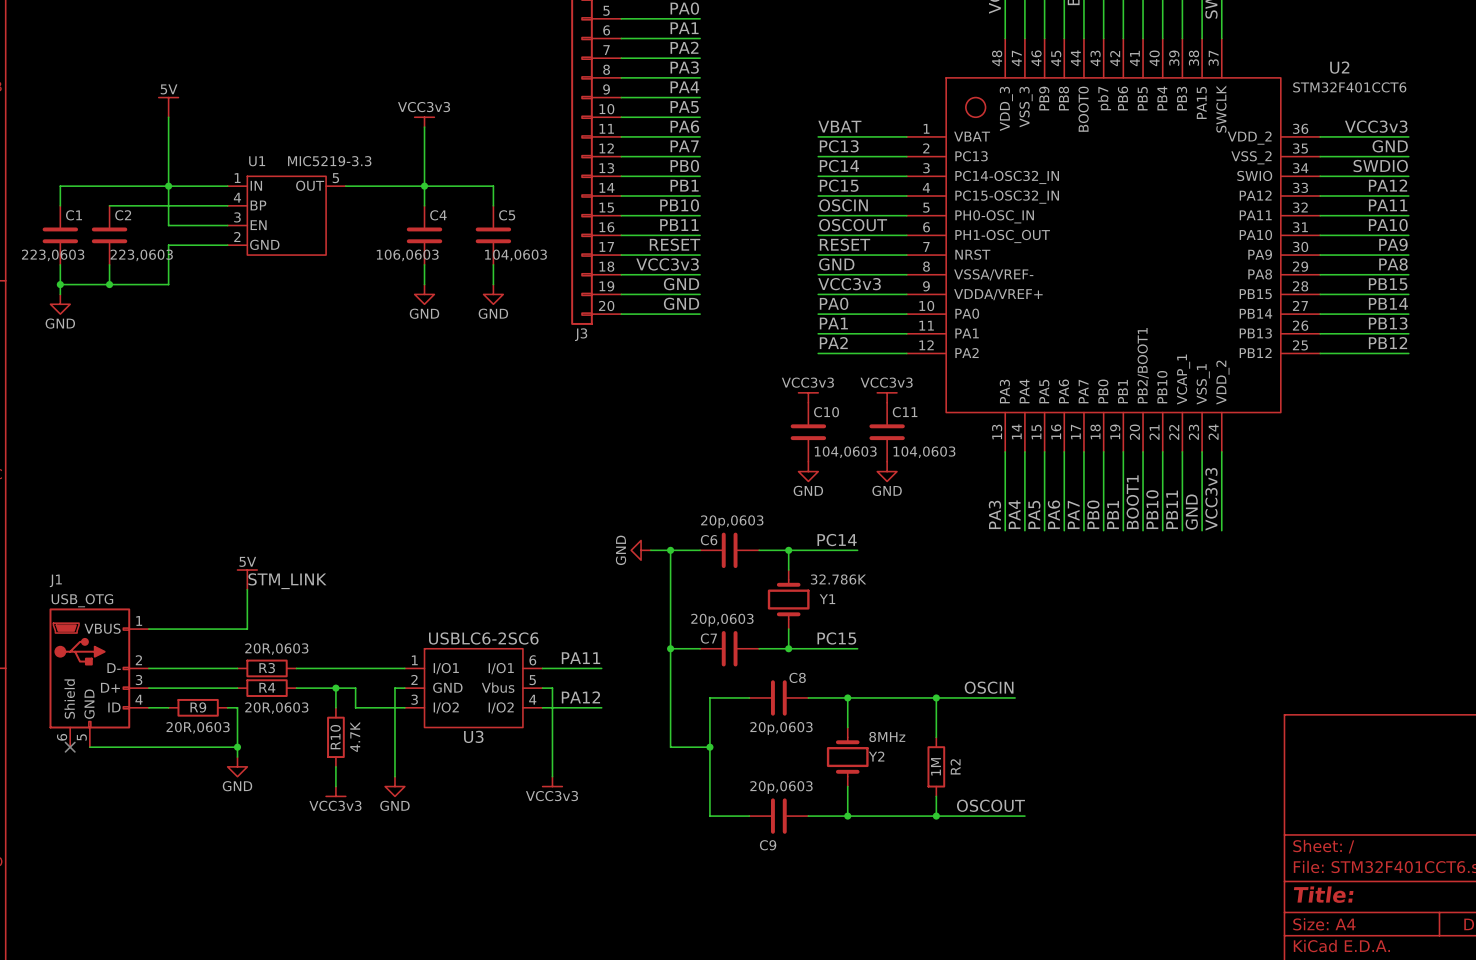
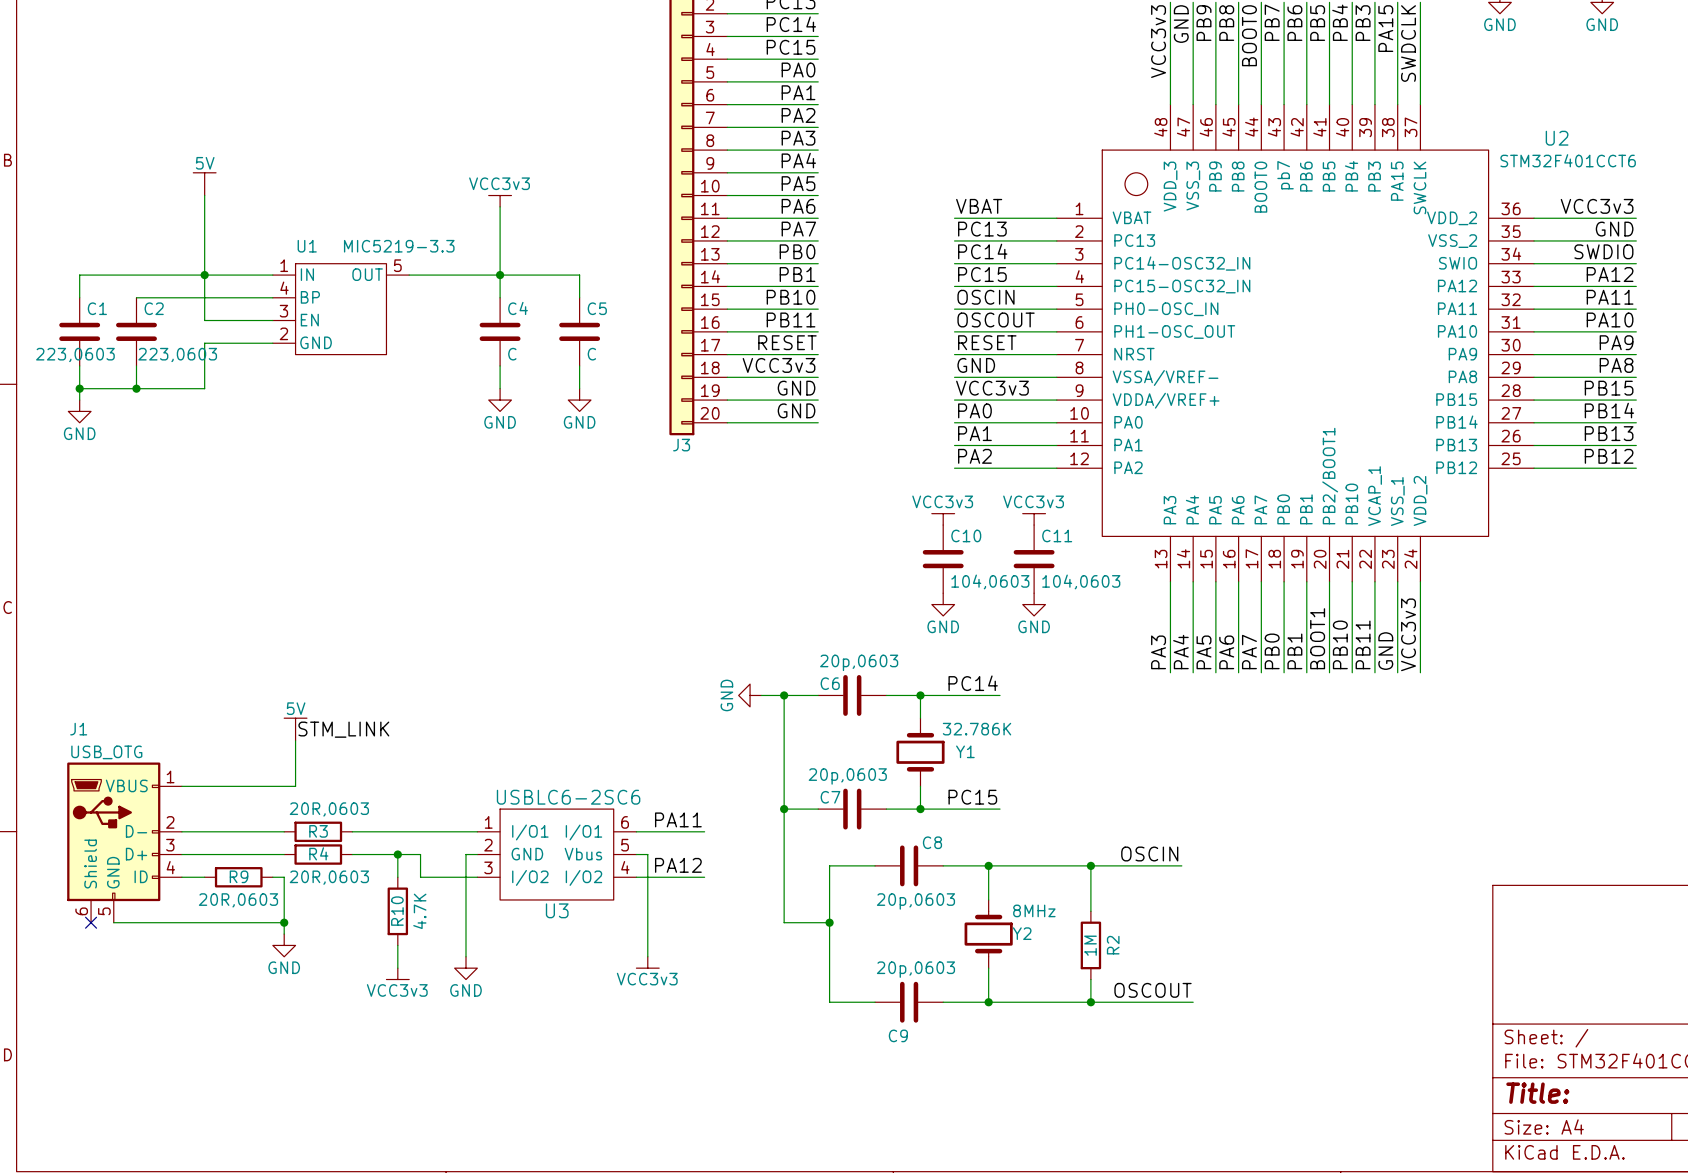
C4 value: 106,0603 (407, 255) -> C (512, 354)
C5 value: 104,0603 (515, 255) -> C (591, 354)

